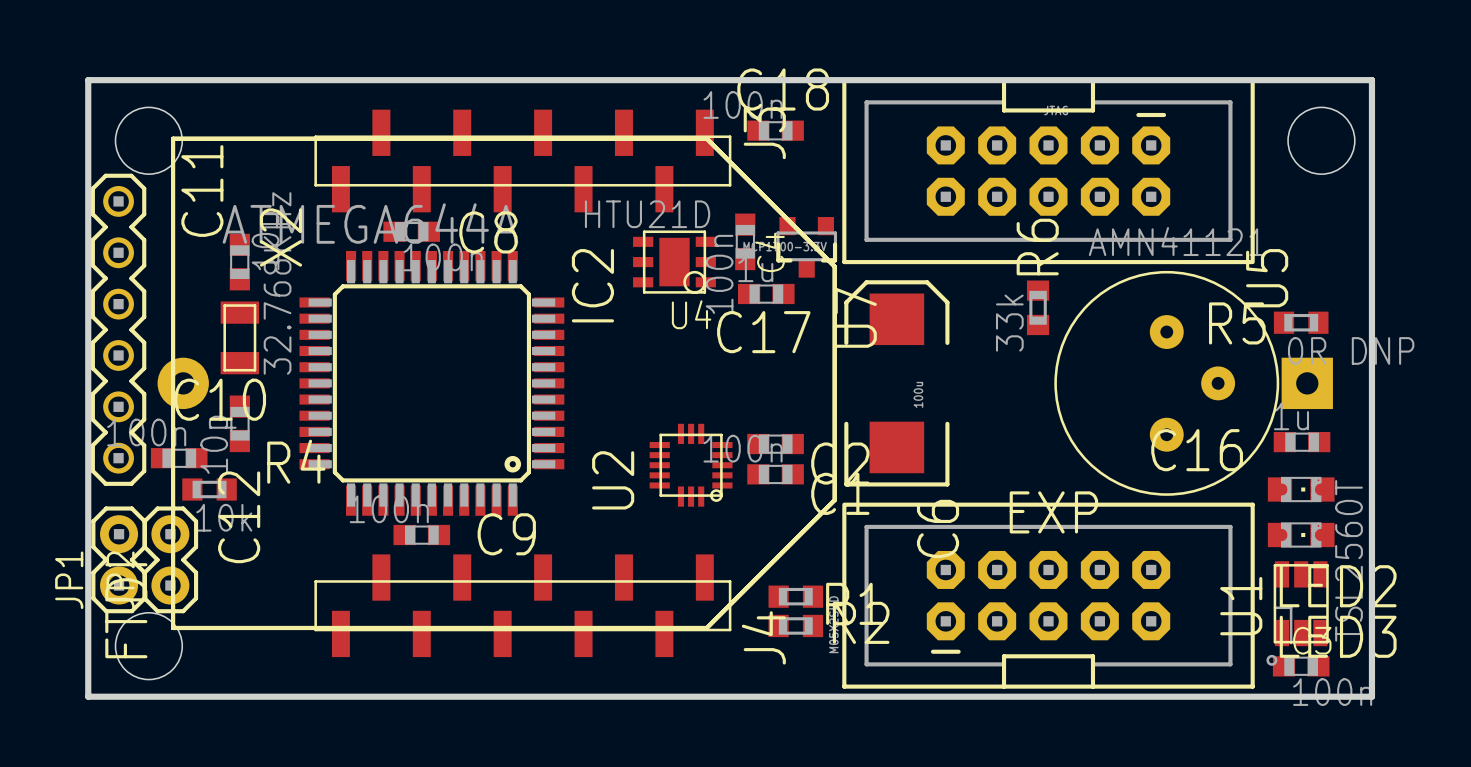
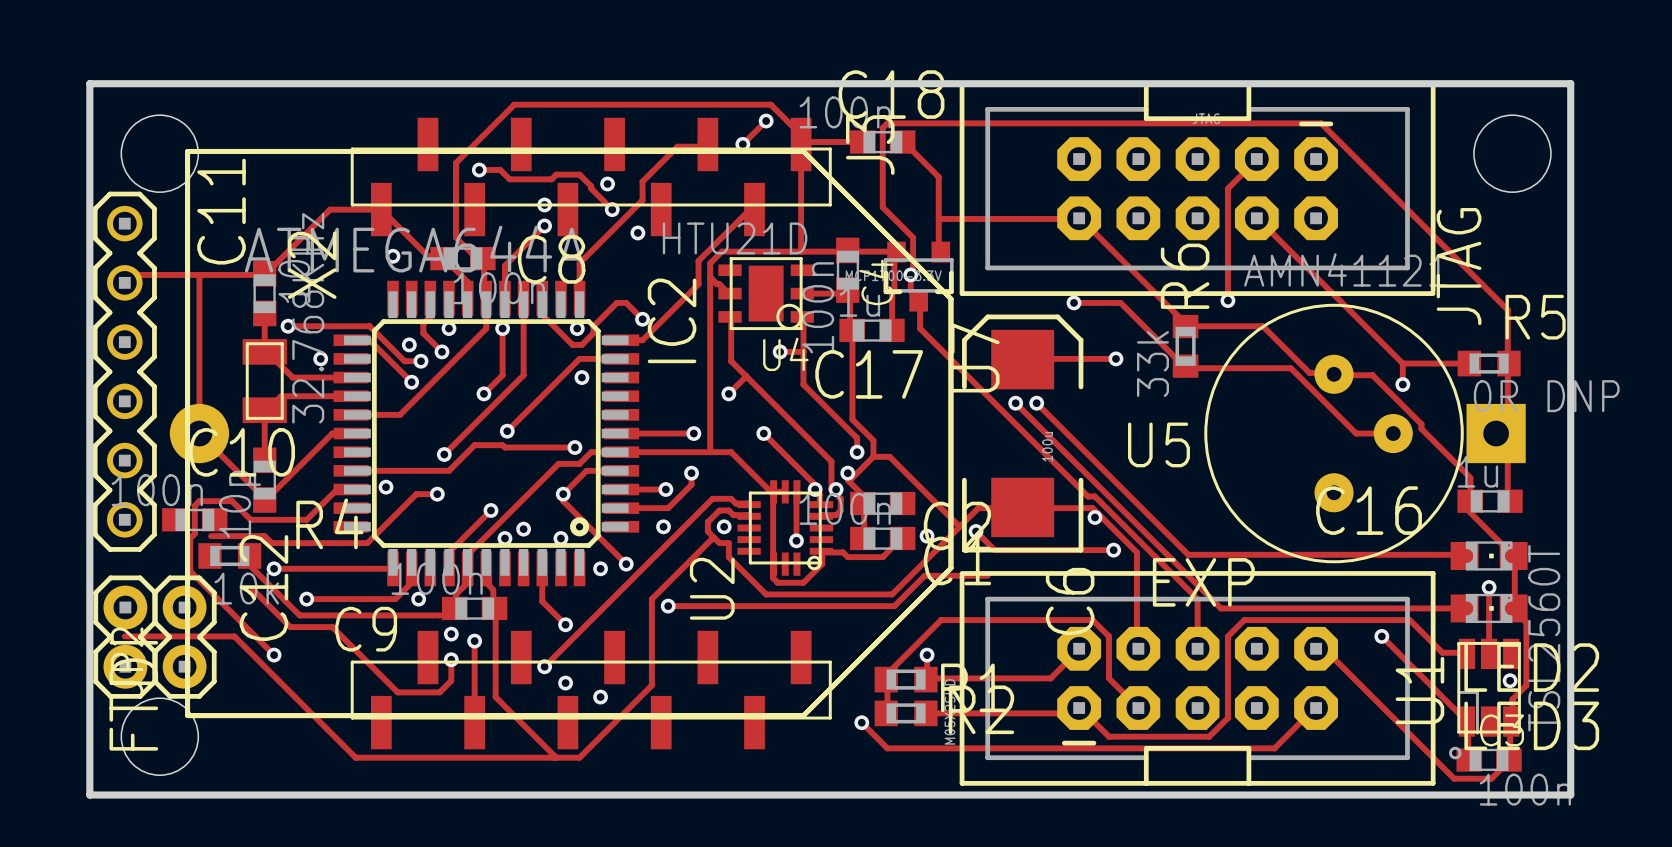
track: none -> (766, 121) (742, 144)
via: none -> (766, 121)
track: none -> (862, 142) (803, 142) (801, 144) (801, 251)
track: none -> (902, 142) (938, 176) (938, 251) (940, 252)
track: none -> (707, 144) (707, 146) (677, 146) (642, 181) (642, 200) (579, 263) (579, 298)
via: none -> (742, 144)
track: none -> (801, 144) (805, 139) (770, 104) (514, 104) (455, 163) (455, 237) (474, 256) (481, 256) (483, 258) (486, 328) (400, 414) (351, 414)
track: none -> (1256, 159) (1227, 188) (1227, 300)
track: none -> (479, 170) (500, 170) (509, 179) (551, 179) (556, 174) (579, 174) (612, 209)
via: none -> (479, 170)
via: none -> (607, 183)
via: none -> (544, 204)
track: none -> (381, 209) (330, 209) (264, 274) (131, 274) (124, 281)
track: none -> (381, 209) (428, 256) (441, 256) (467, 281) (467, 298)
via: none -> (612, 209)
track: none -> (754, 209) (749, 209) (698, 260) (698, 284) (642, 340) (621, 340)
track: none -> (1256, 218) (1402, 363)
track: none -> (938, 218) (1080, 218) (1183, 321) (1183, 326) (1262, 326) (1309, 372) (1372, 375) (1421, 424) (1421, 428) (1470, 477) (1470, 512) (1514, 557) (1513, 608) (1526, 622) (1526, 685) (1512, 699) (1510, 760) (1491, 778) (1454, 778) (1325, 650) (1316, 650) (1316, 648)
track: none -> (544, 225) (504, 265) (504, 298)
via: none -> (544, 225)
via: none -> (637, 232)
via: none -> (393, 256)
text: none -> JTAG (1459, 266)
track: none -> (199, 274) (199, 433) (264, 499) (332, 433) (351, 433)
via: none -> (910, 274)
track: none -> (711, 278) (710, 452)
track: none -> (730, 293) (710, 277) (710, 263) (721, 251) (894, 251) (896, 252) (894, 253) (891, 330)
track: none -> (802, 293) (845, 293) (847, 290) (850, 291) (850, 328) (852, 333) (852, 419) (873, 440) (873, 456)
track: none -> (430, 298) (430, 316) (423, 323) (423, 333) (441, 351)
track: none -> (523, 298) (523, 375) (444, 454)
track: none -> (542, 298) (542, 314) (572, 344) (581, 344) (593, 333) (593, 326) (616, 302) (626, 302) (642, 319)
via: none -> (1227, 300)
track: none -> (1073, 302) (1120, 302) (1185, 368) (1290, 368) (1356, 433) (1393, 433)
via: none -> (1073, 302)
U5 name rotation: 0° (1267, 278) -> 90° clockwise (1158, 444)
U5 name position: U5 (1267, 278) -> U5 (1158, 444)
track: none -> (264, 313) (264, 351) (267, 351) (292, 377) (351, 377)
track: none -> (730, 316) (731, 361) (831, 461) (831, 489)
track: none -> (802, 316) (803, 384) (857, 438) (857, 452)
via: none -> (642, 319)
track: none -> (288, 326) (369, 326) (404, 361) (421, 361)
via: none -> (288, 326)
via: none -> (448, 328)
track: none -> (502, 328) (502, 375) (483, 393)
via: none -> (502, 328)
via: none -> (577, 328)
track: none -> (351, 340) (369, 340) (411, 382)
via: none -> (409, 344)
via: none -> (441, 351)
track: none -> (780, 351) (803, 351)
via: none -> (780, 351)
via: none -> (320, 358)
track: none -> (621, 358) (579, 358) (507, 431)
track: none -> (1115, 358) (1022, 359)
via: none -> (1115, 358)
via: none -> (421, 361)
track: none -> (1402, 363) (1469, 363)
track: none -> (1402, 363) (1402, 384)
R5 name position: R5 (1237, 323) -> R5 (1535, 317)
track: none -> (746, 376) (728, 393)
via: none -> (581, 377)
via: none -> (411, 382)
via: none -> (1402, 384)
via: none -> (483, 393)
via: none -> (728, 393)
track: none -> (351, 396) (281, 396) (267, 410) (264, 410) (264, 460)
track: none -> (1015, 403) (1220, 608) (1464, 608)
via: none -> (1015, 403)
track: none -> (1036, 403) (1188, 554) (1464, 555)
via: none -> (1036, 403)
via: none -> (507, 431)
track: none -> (621, 433) (693, 433)
via: none -> (693, 433)
track: none -> (763, 433) (815, 484) (815, 489) (819, 494) (821, 504)
via: none -> (763, 433)
track: none -> (574, 447) (504, 447) (502, 445) (474, 445) (448, 470) (351, 470)
via: none -> (574, 447)
via: none -> (857, 452)
via: none -> (444, 454)
track: none -> (873, 456) (850, 480) (847, 473) (847, 480) (861, 494) (861, 503) (864, 505) (862, 538)
track: none -> (873, 456) (889, 456) (959, 526)
track: none -> (621, 470) (586, 470) (563, 494) (563, 501) (626, 564)
track: none -> (691, 473) (691, 484) (668, 508) (621, 508)
via: none -> (691, 473)
via: none -> (847, 473)
via: none -> (386, 487)
track: none -> (351, 489) (337, 489) (306, 519) (250, 519) (232, 501) (199, 501) (194, 505) (194, 533) (190, 538) (190, 571) (274, 655)
track: none -> (621, 489) (665, 489)
via: none -> (665, 489)
via: none -> (815, 489)
track: none -> (831, 489) (840, 498) (840, 510) (836, 515) (821, 516)
via: none -> (836, 489)
track: none -> (773, 491) (773, 564)
track: none -> (785, 491) (770, 491) (731, 452) (591, 452) (579, 463) (558, 463) (467, 554) (467, 582) (455, 594) (455, 608) (448, 615) (299, 615) (250, 566) (249, 555)
track: none -> (796, 491) (796, 540)
track: none -> (437, 494) (416, 494) (367, 543) (271, 543) (264, 536) (211, 536)
via: none -> (437, 494)
via: none -> (563, 494)
track: none -> (1509, 501) (1507, 501) (1507, 445) (1496, 433) (1507, 442) (1507, 309) (1321, 123) (887, 123) (882, 128) (882, 207) (913, 237) (913, 274) (910, 274) (910, 291) (920, 302) (920, 328) (1087, 496) (1094, 496) (1197, 599) (1197, 648)
track: none -> (749, 504) (735, 503) (731, 498) (712, 498) (544, 666)
track: none -> (490, 510) (448, 552) (448, 568)
via: none -> (490, 510)
track: none -> (749, 516) (733, 515) (728, 510) (719, 510) (707, 522) (707, 531) (719, 543) (728, 543) (728, 557) (766, 594) (892, 594) (978, 508) (1092, 508) (1136, 552) (1138, 648)
via: none -> (1094, 517)
via: none -> (663, 526)
via: none -> (724, 526)
via: none -> (523, 529)
track: none -> (976, 531) (994, 550) (1113, 550)
via: none -> (976, 531)
via: none -> (927, 536)
track: none -> (713, 537) (651, 599) (651, 685) (579, 757) (556, 757) (495, 697) (495, 610) (493, 608) (493, 589) (486, 582) (486, 568)
via: none -> (504, 538)
via: none -> (560, 538)
track: none -> (902, 538) (882, 557) (847, 557) (843, 552) (822, 552)
via: none -> (796, 540)
U2 name position: U2 (613, 480) -> U2 (712, 588)
via: none -> (1113, 550)
track: none -> (822, 552) (822, 564) (803, 582) (777, 582) (773, 578) (773, 564)
via: none -> (626, 564)
track: none -> (274, 568) (393, 568)
via: none -> (274, 568)
track: none -> (411, 568) (411, 582) (395, 599) (306, 599)
track: none -> (542, 568) (542, 601) (565, 624)
via: none -> (600, 568)
track: none -> (987, 575) (924, 575) (894, 606) (668, 606)
track: none -> (1489, 587) (1489, 653)
via: none -> (1489, 587)
track: none -> (253, 589) (290, 627) (332, 627) (397, 692) (439, 692) (451, 680) (451, 659)
via: none -> (306, 599)
via: none -> (418, 599)
via: none -> (668, 606)
C9 name position: C9 (506, 534) -> C9 (366, 629)
via: none -> (565, 624)
via: none -> (451, 634)
track: none -> (124, 636) (234, 636) (355, 757) (555, 756)
track: none -> (1381, 636) (1468, 722) (1469, 760)
via: none -> (1381, 636)
track: none -> (474, 641) (474, 722)
via: none -> (474, 641)
track: none -> (1079, 648) (1050, 678) (925, 679) (927, 655)
track: none -> (1466, 653) (1442, 652) (1409, 620) (1244, 620) (1227, 636) (1227, 718) (1209, 736) (1108, 736) (1079, 708) (1073, 713) (925, 713)
via: none -> (274, 655)
via: none -> (927, 655)
via: none -> (451, 659)
JP1 name: JP1 (69, 580) -> none
via: none -> (544, 666)
via: none -> (1510, 680)
via: none -> (565, 683)
via: none -> (600, 697)
track: none -> (1138, 708) (1108, 678) (1108, 636) (1092, 620) (941, 620) (887, 673) (886, 713)
track: none -> (1316, 708) (1274, 748) (887, 748) (861, 722)
via: none -> (861, 722)
J4 name: J4 (763, 637) -> none

